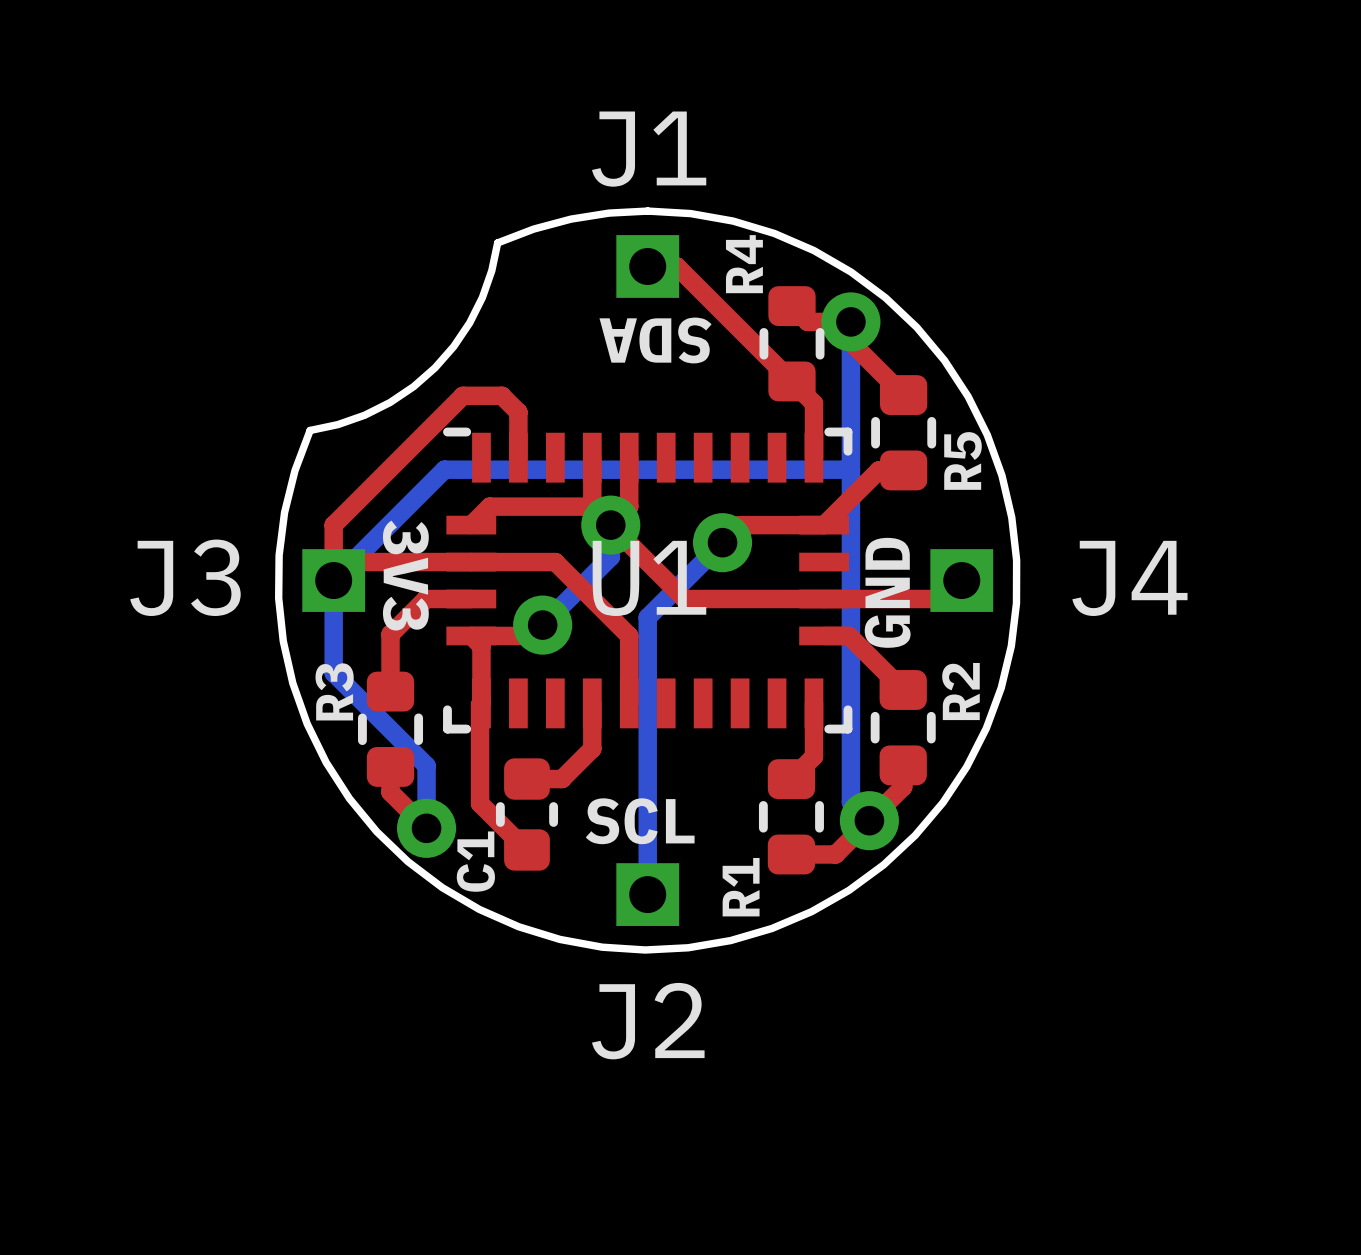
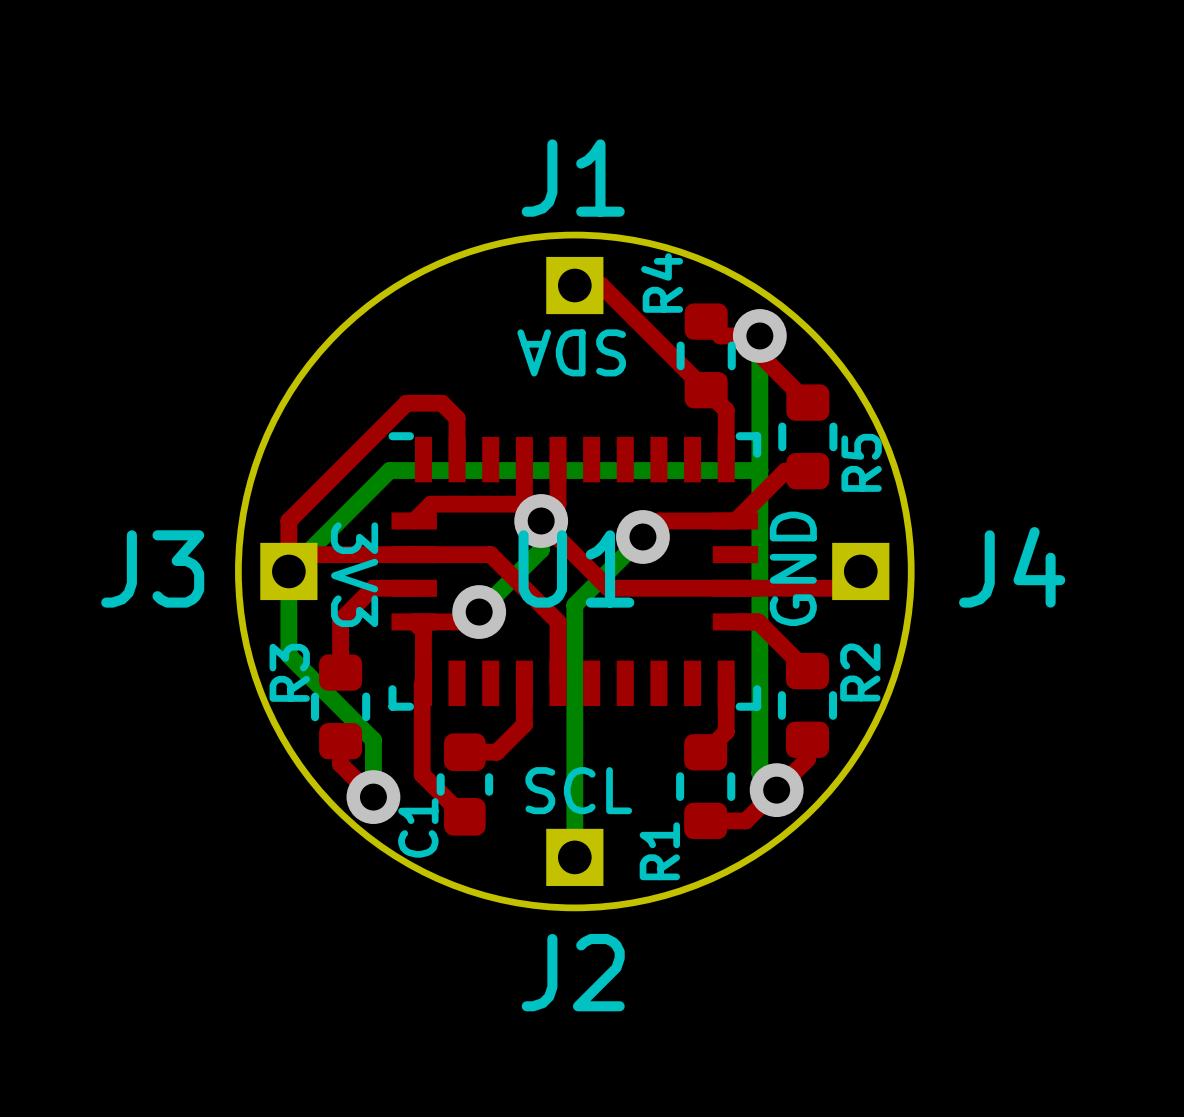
round board edge: none -> [235, 231, 915, 912]
board edge: (647, 211) (690, 213) (733, 221) (774, 233) (813, 250) (851, 272) (885, 297) (916, 327) (944, 360) (968, 396) (987, 435) (1001, 475) (1011, 517) (1016, 560) (1016, 603) (1011, 646) (1001, 687) (986, 728) (966, 766) (943, 802) (915, 835) (883, 864) (849, 890) (811, 911) (772, 928) (730, 940) (688, 947) (645, 949) (602, 947) (559, 939) (518, 926) (479, 909) (442, 887) (407, 861) (376, 831) (349, 798) (326, 762) (307, 723) (292, 683) (283, 641) (278, 598) (279, 555) (284, 512) (294, 470) (310, 430) (337, 424) (364, 415) (390, 402) (413, 386) (435, 367) (453, 346) (469, 322) (482, 297) (491, 270) (497, 242) (533, 229) (571, 219) (609, 213) (647, 211) -> none

